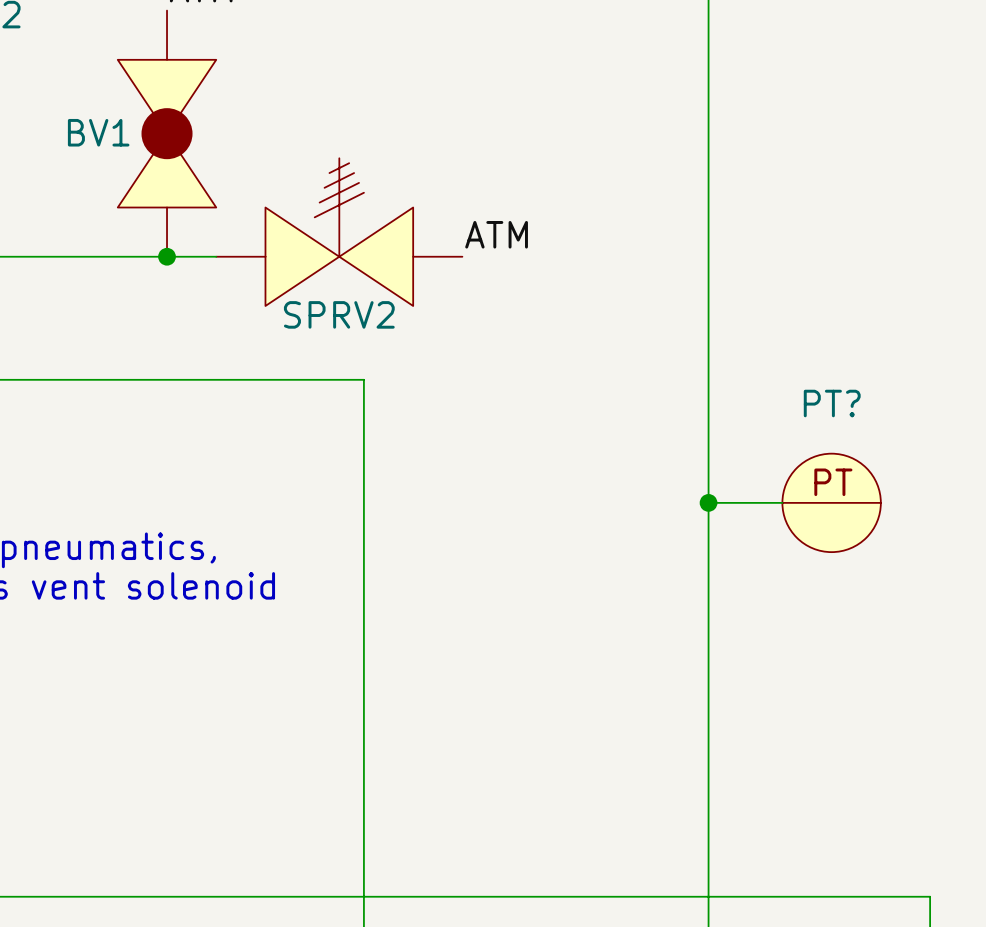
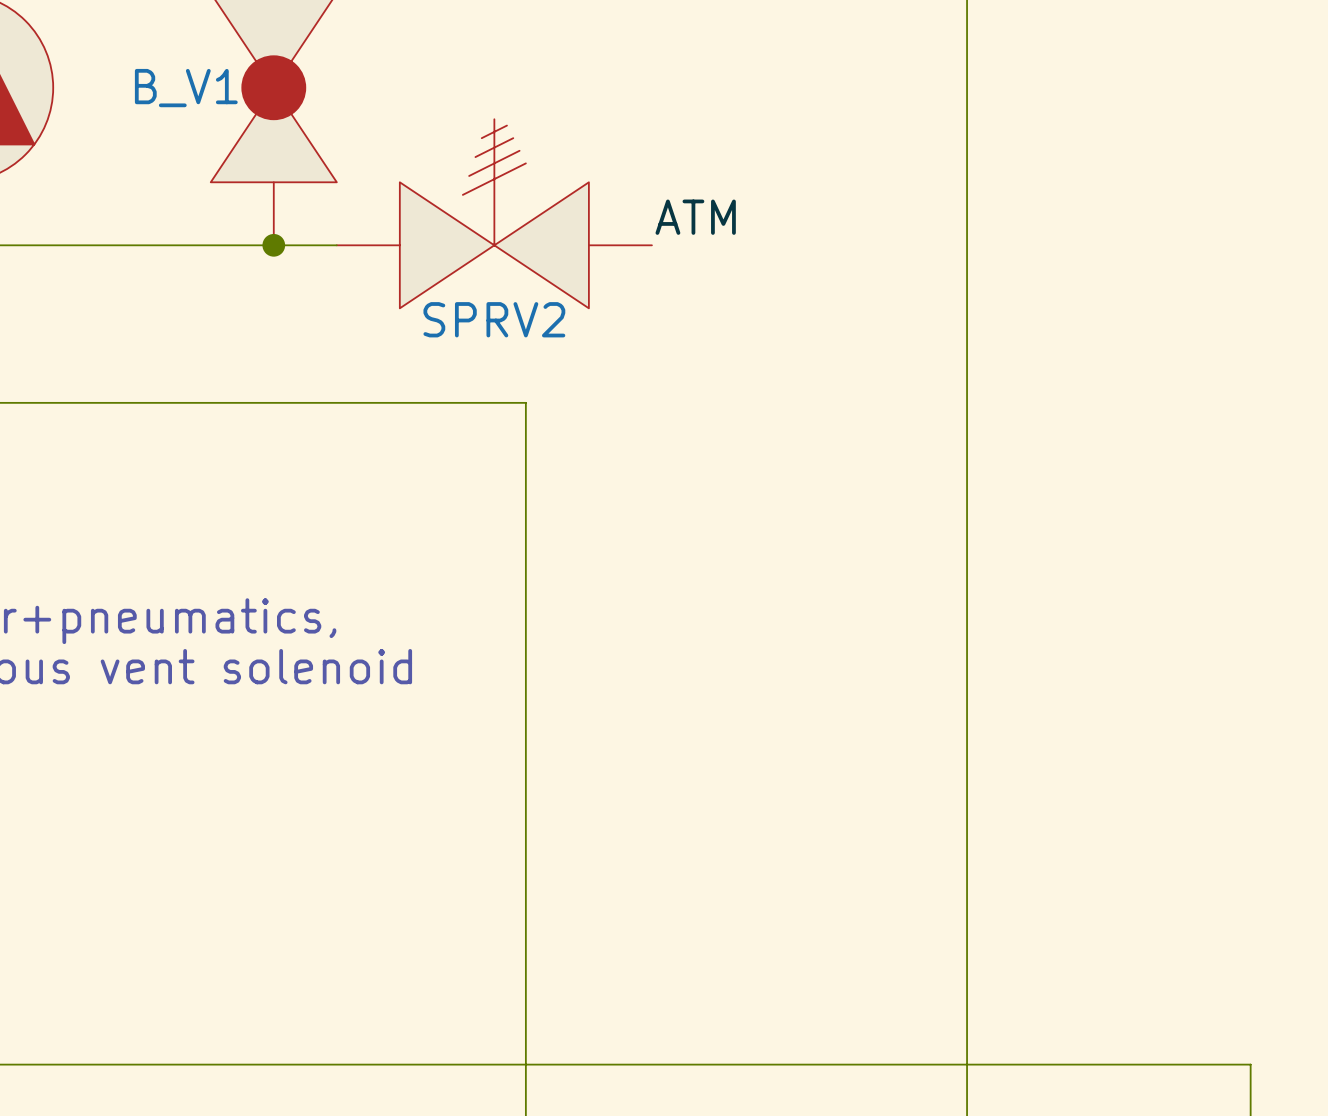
BV1 name: BV1 (98, 132) -> B_V1 (186, 88)
wire: (708, 502) (782, 502) -> none
junction: (708, 502) -> none
PT?: (831, 502) -> none

